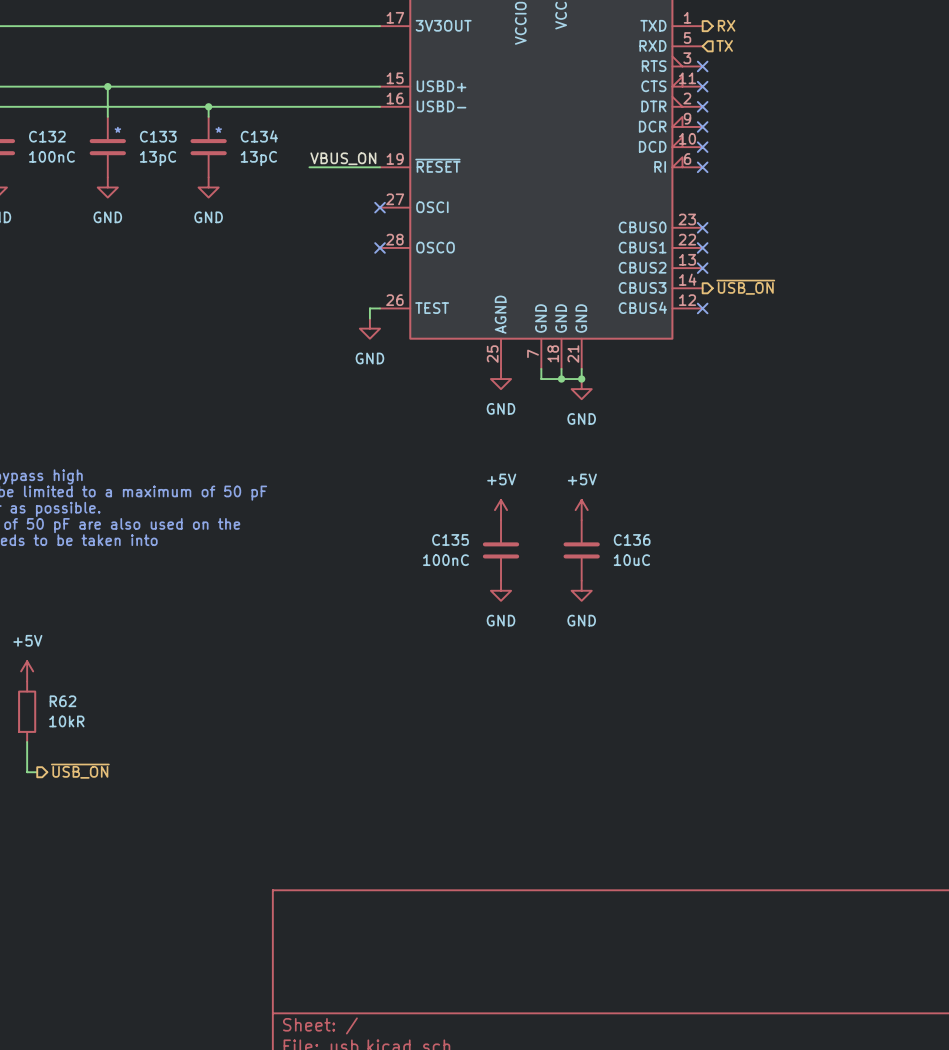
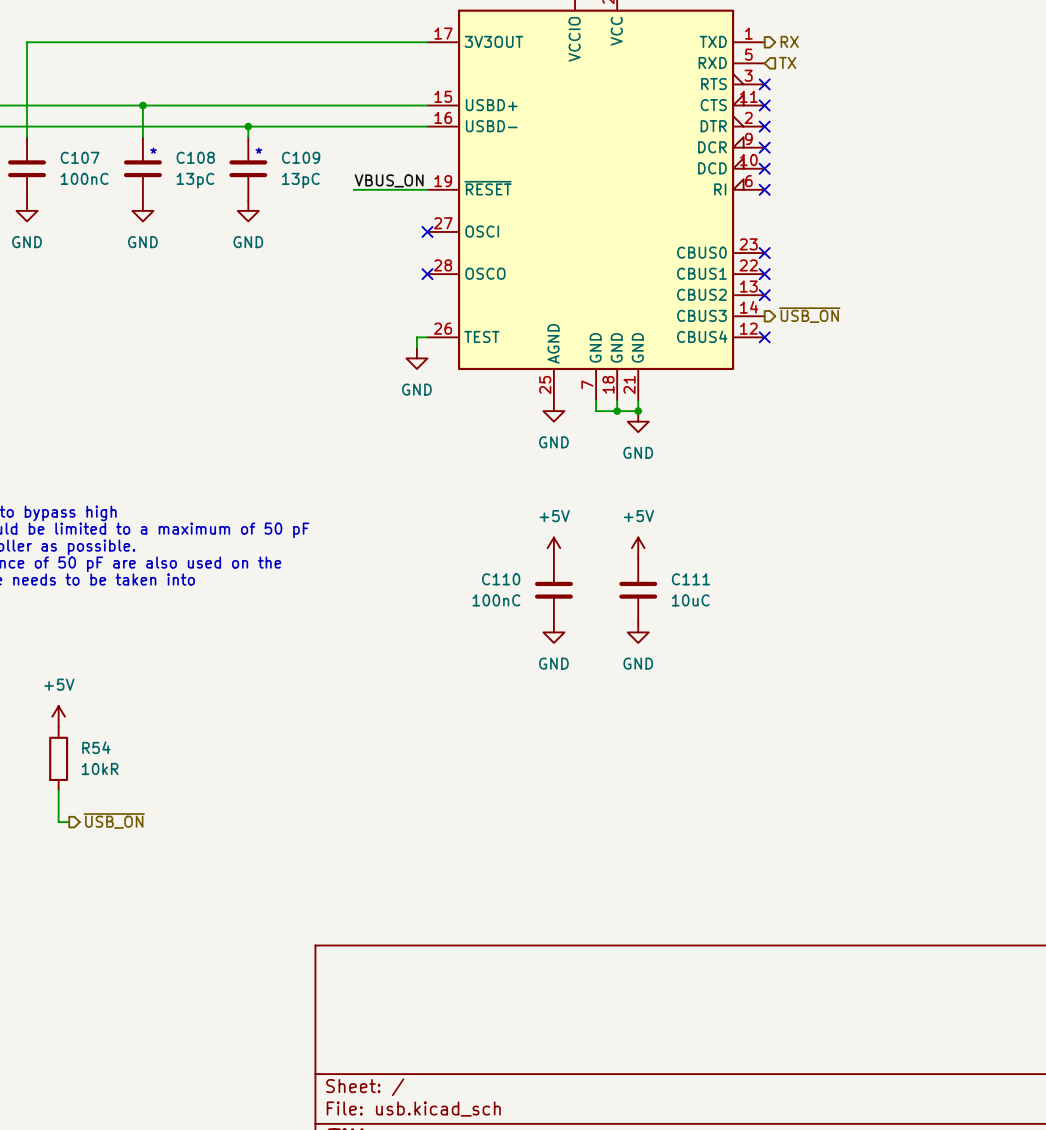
C132 name: C132 (47, 136) -> C107 (80, 157)
C133 name: C133 (158, 136) -> C108 (195, 157)
C134 name: C134 (259, 136) -> C109 (301, 157)
C135 name: C135 (450, 539) -> C110 (501, 579)
C136 name: C136 (632, 539) -> C111 (691, 579)
R62 name: R62 (62, 701) -> R54 (96, 747)

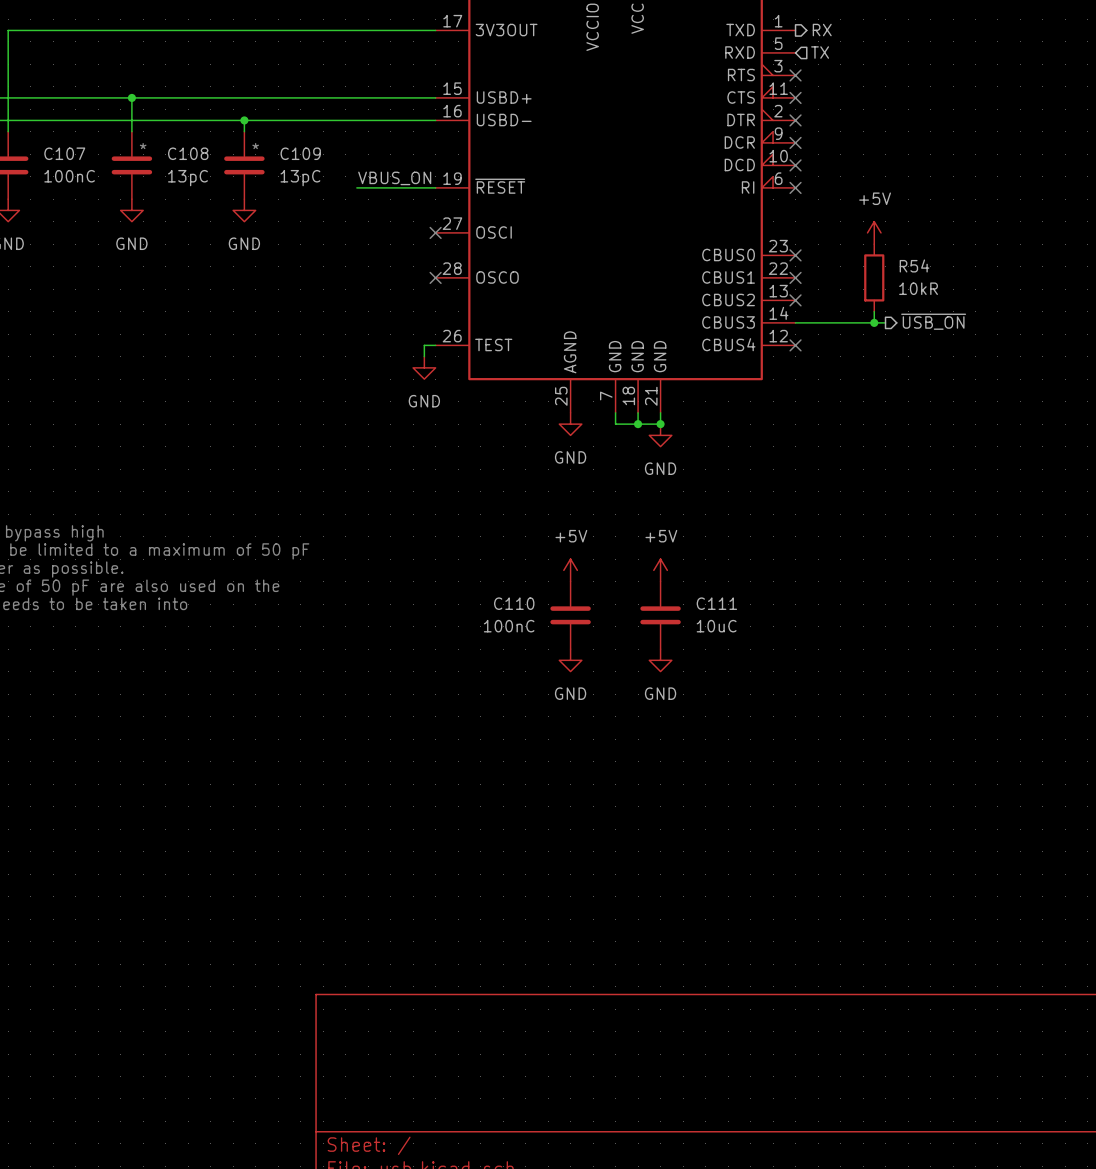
power symbol: none -> +5V (874, 232)
wire: none -> (874, 311) (874, 322)
hierarchical label position: ~{USB_ON} (809, 315) -> ~{USB_ON} (933, 321)
wire: none -> (795, 322) (885, 322)
junction: none -> (874, 322)
power symbol: +5V (58, 716) -> none
R54 position: (58, 758) -> (874, 277)
wire: (58, 790) (58, 822) (69, 822) -> none
hierarchical label: ~{USB_ON} (114, 820) -> none

